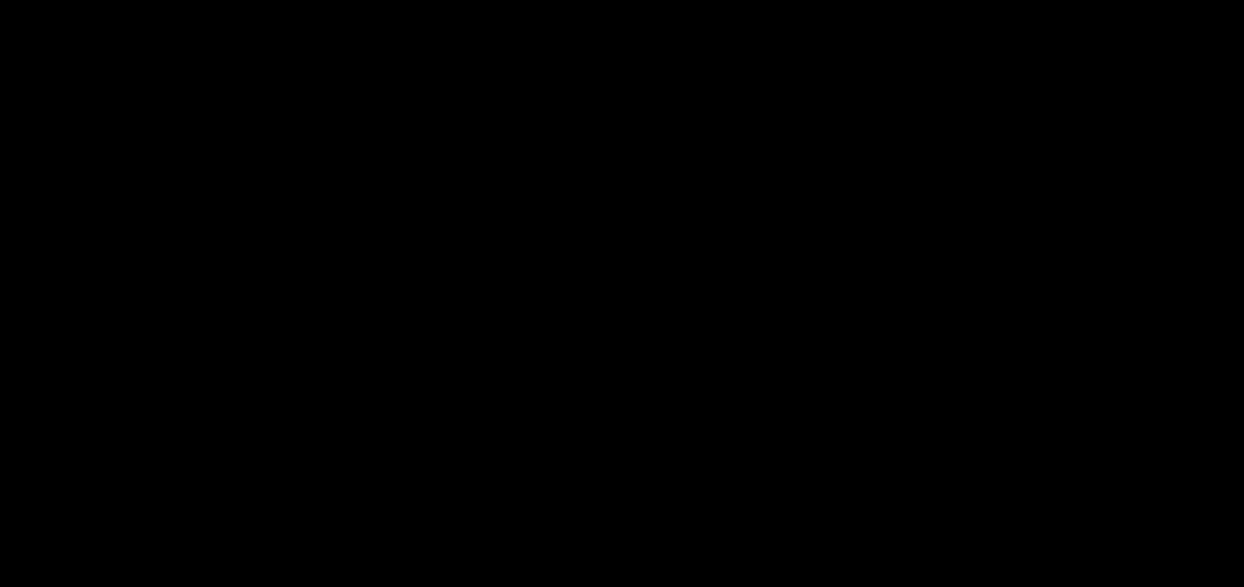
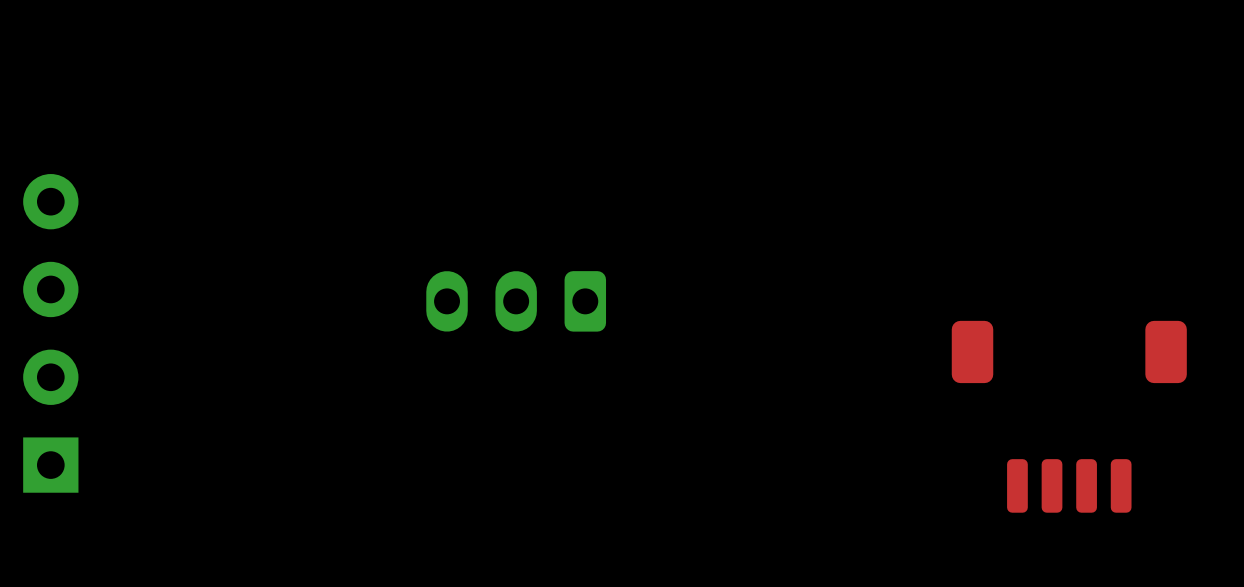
part: none -> (516, 301)
part: none -> (50, 333)
part: none -> (1069, 416)

